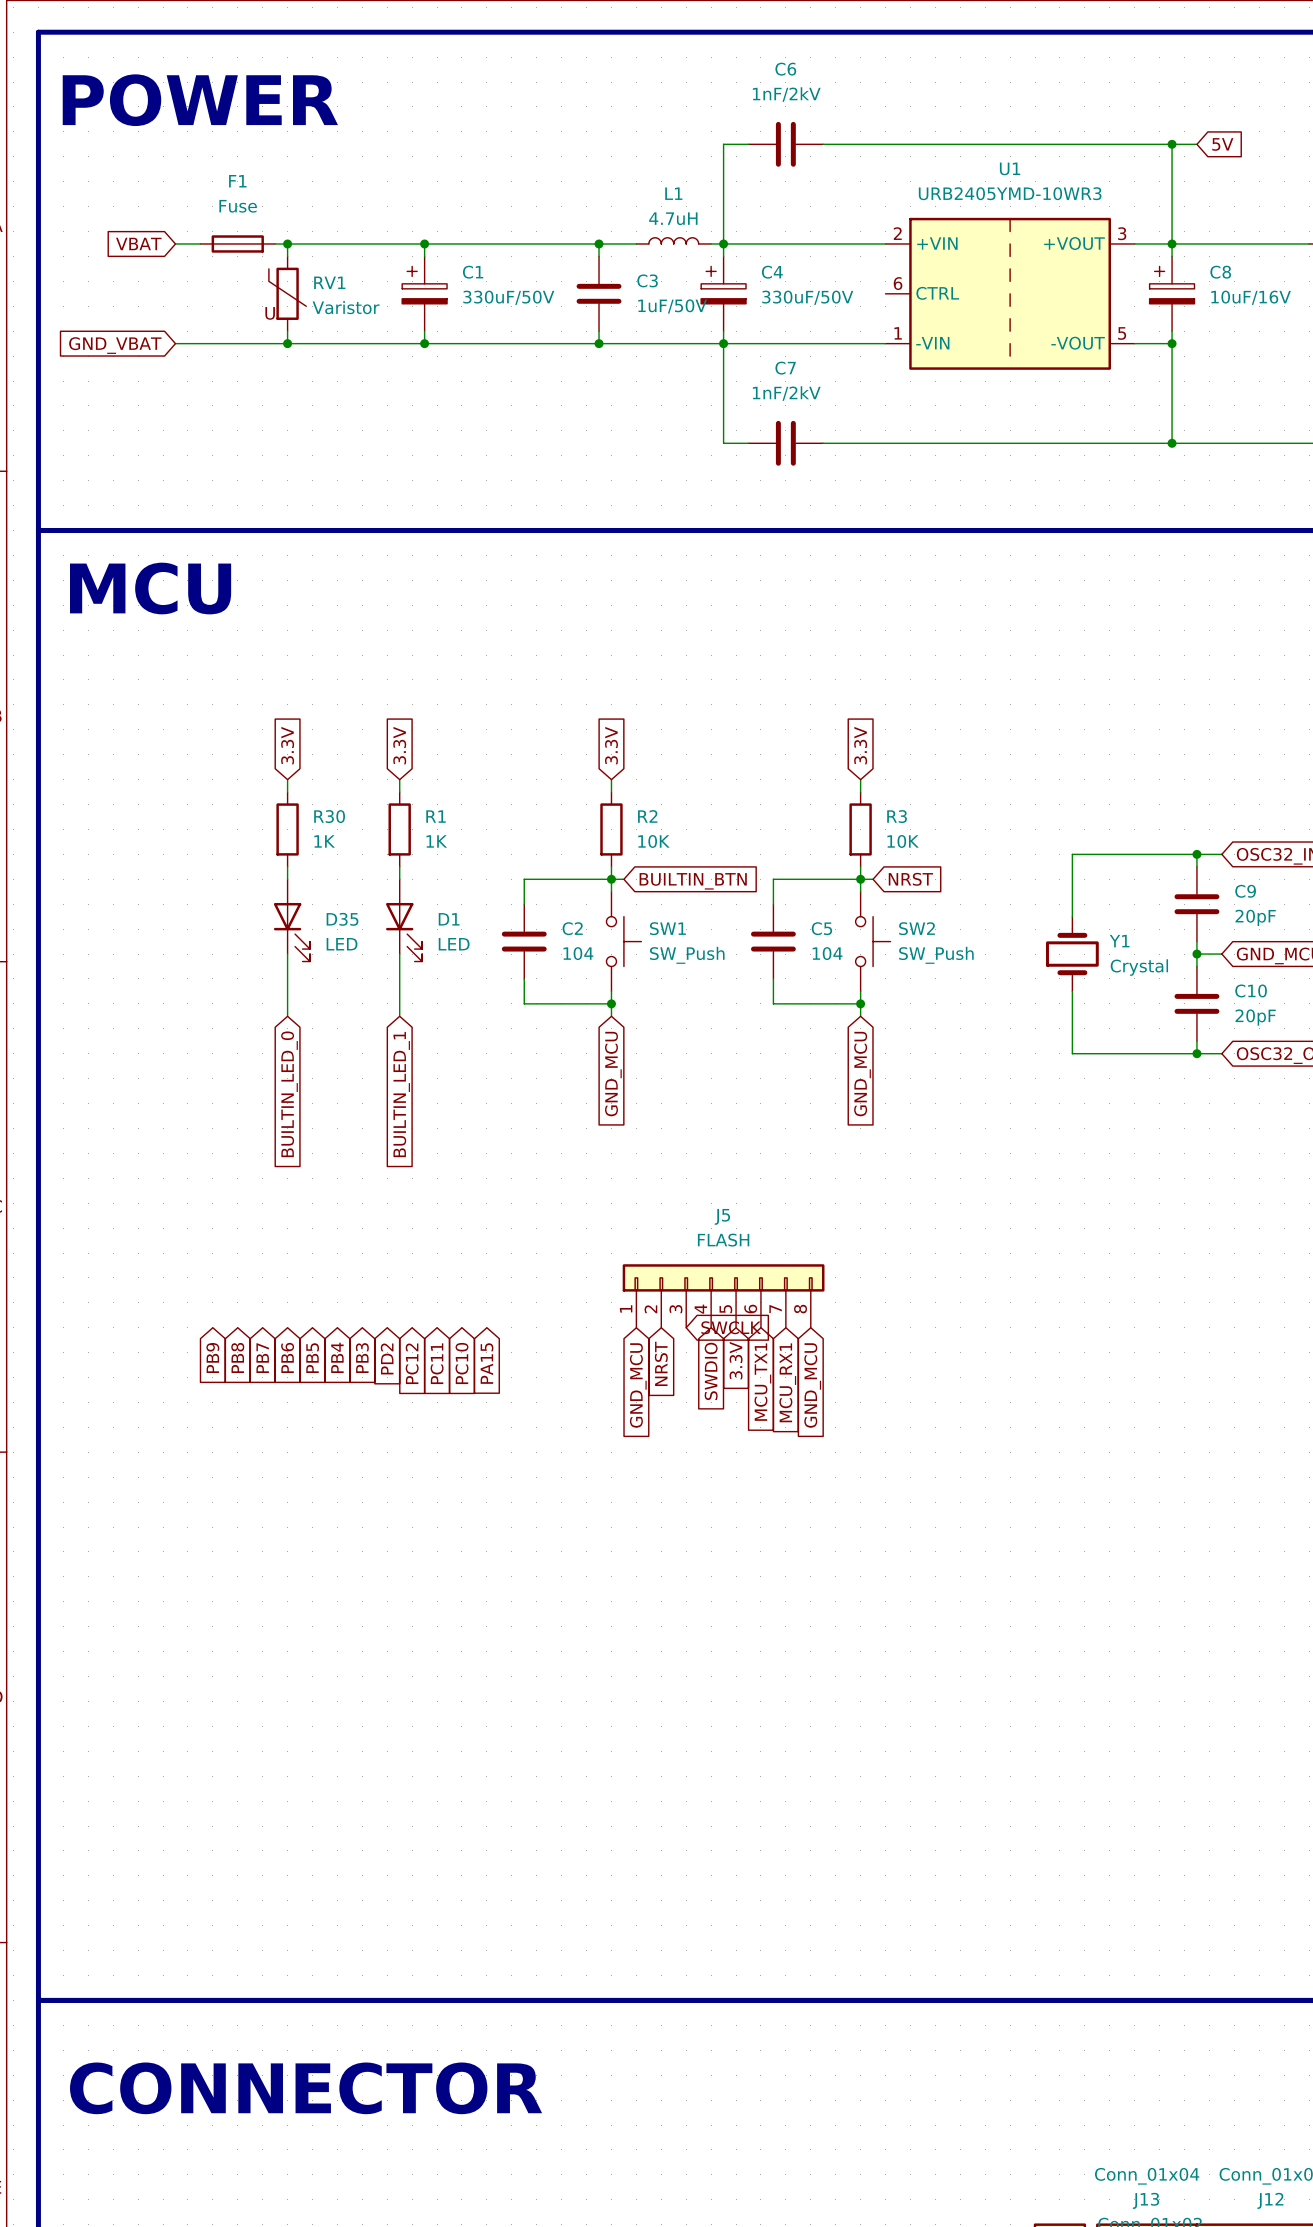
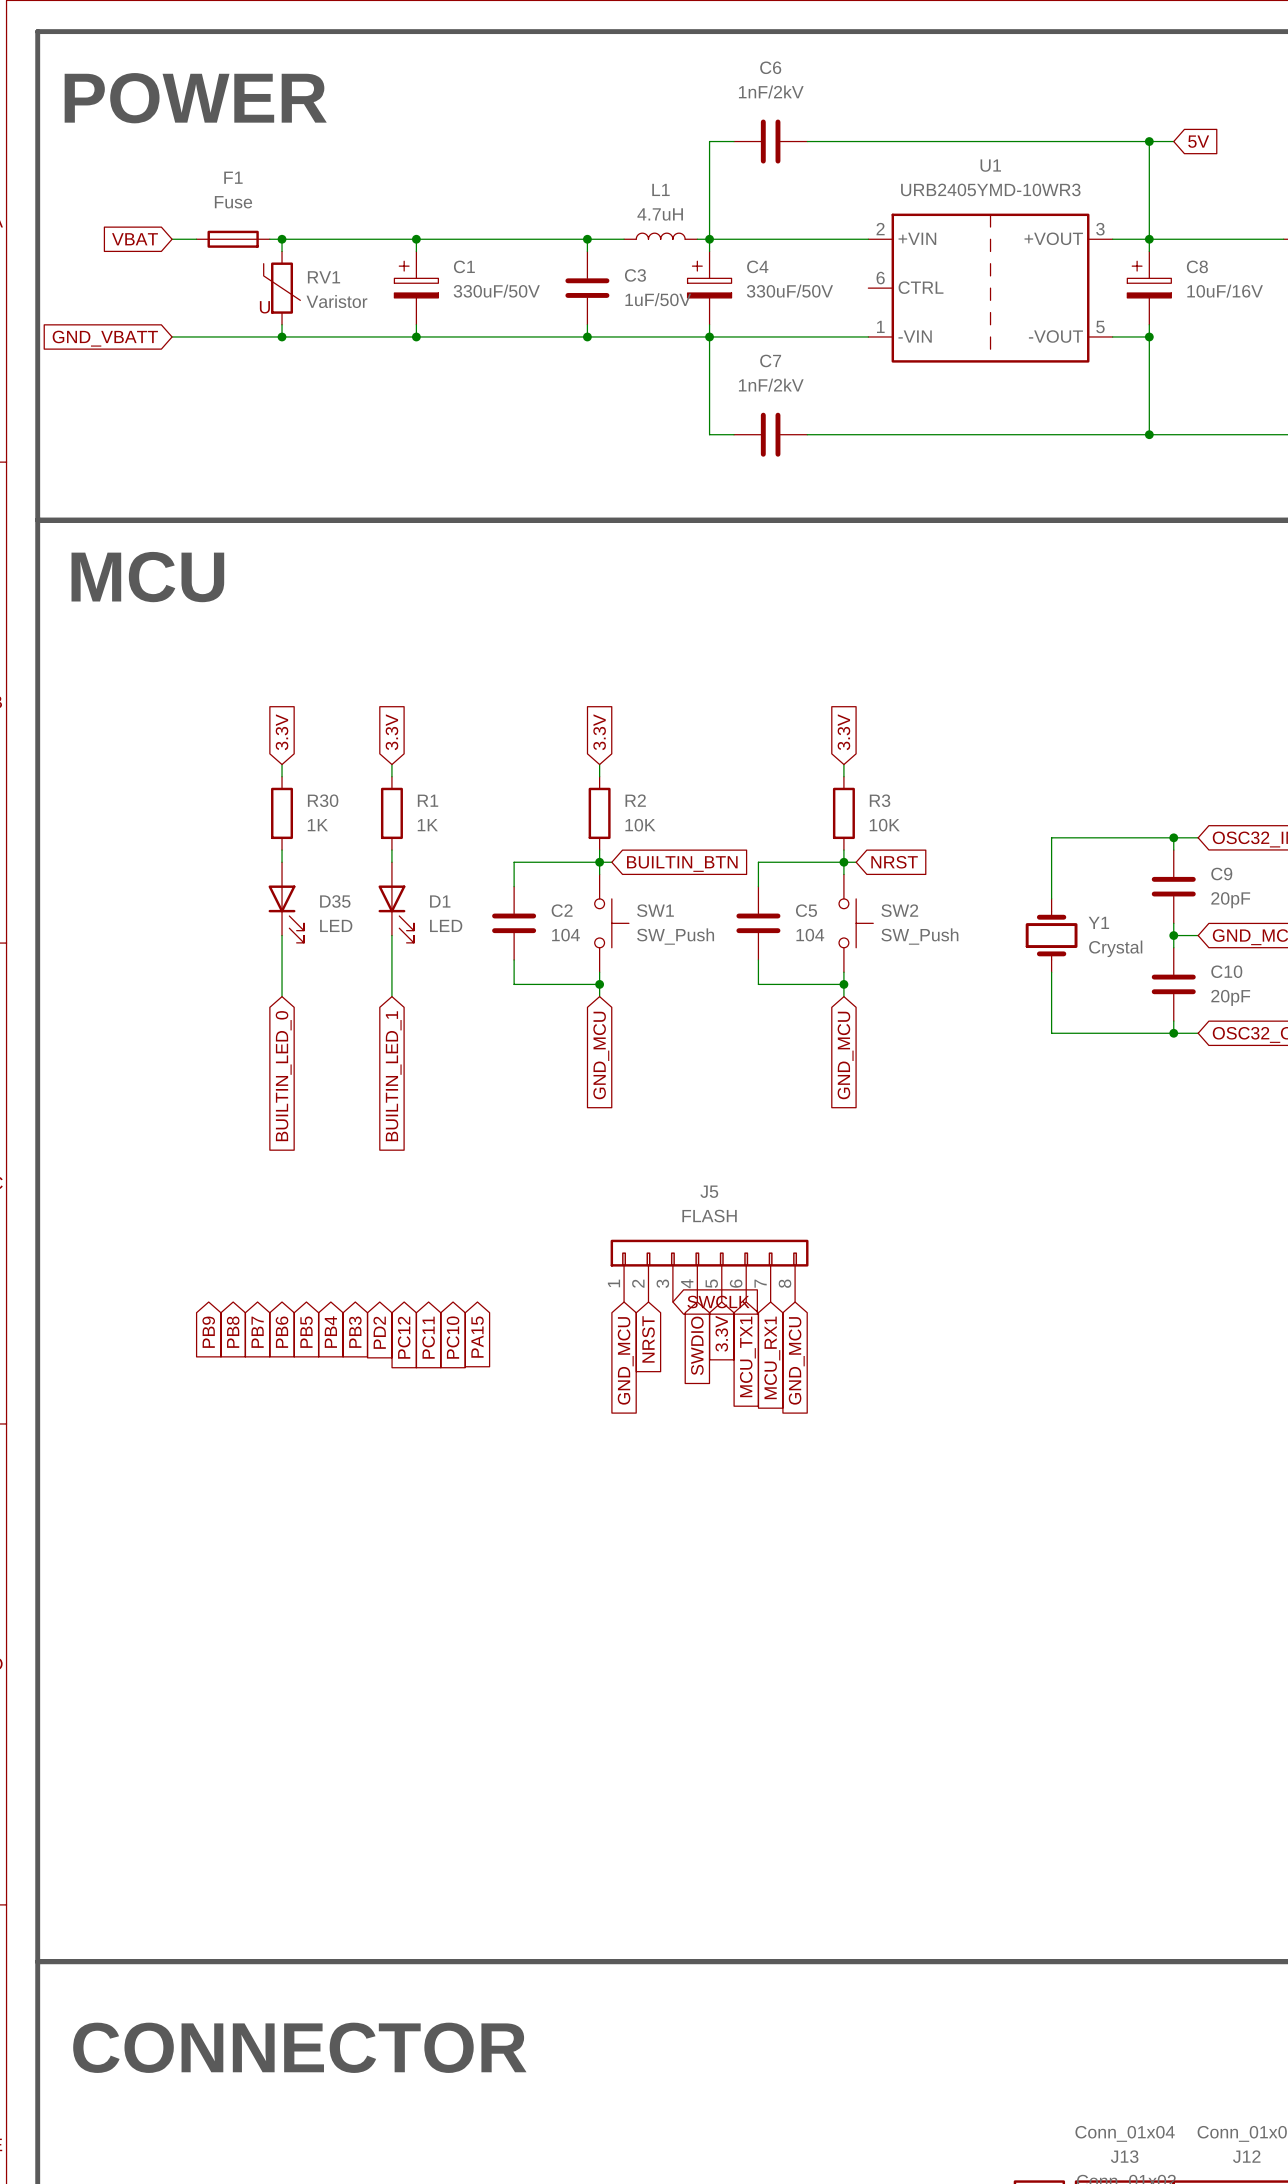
global label: GND_VBAT (115, 345) -> GND_VBATT (105, 338)

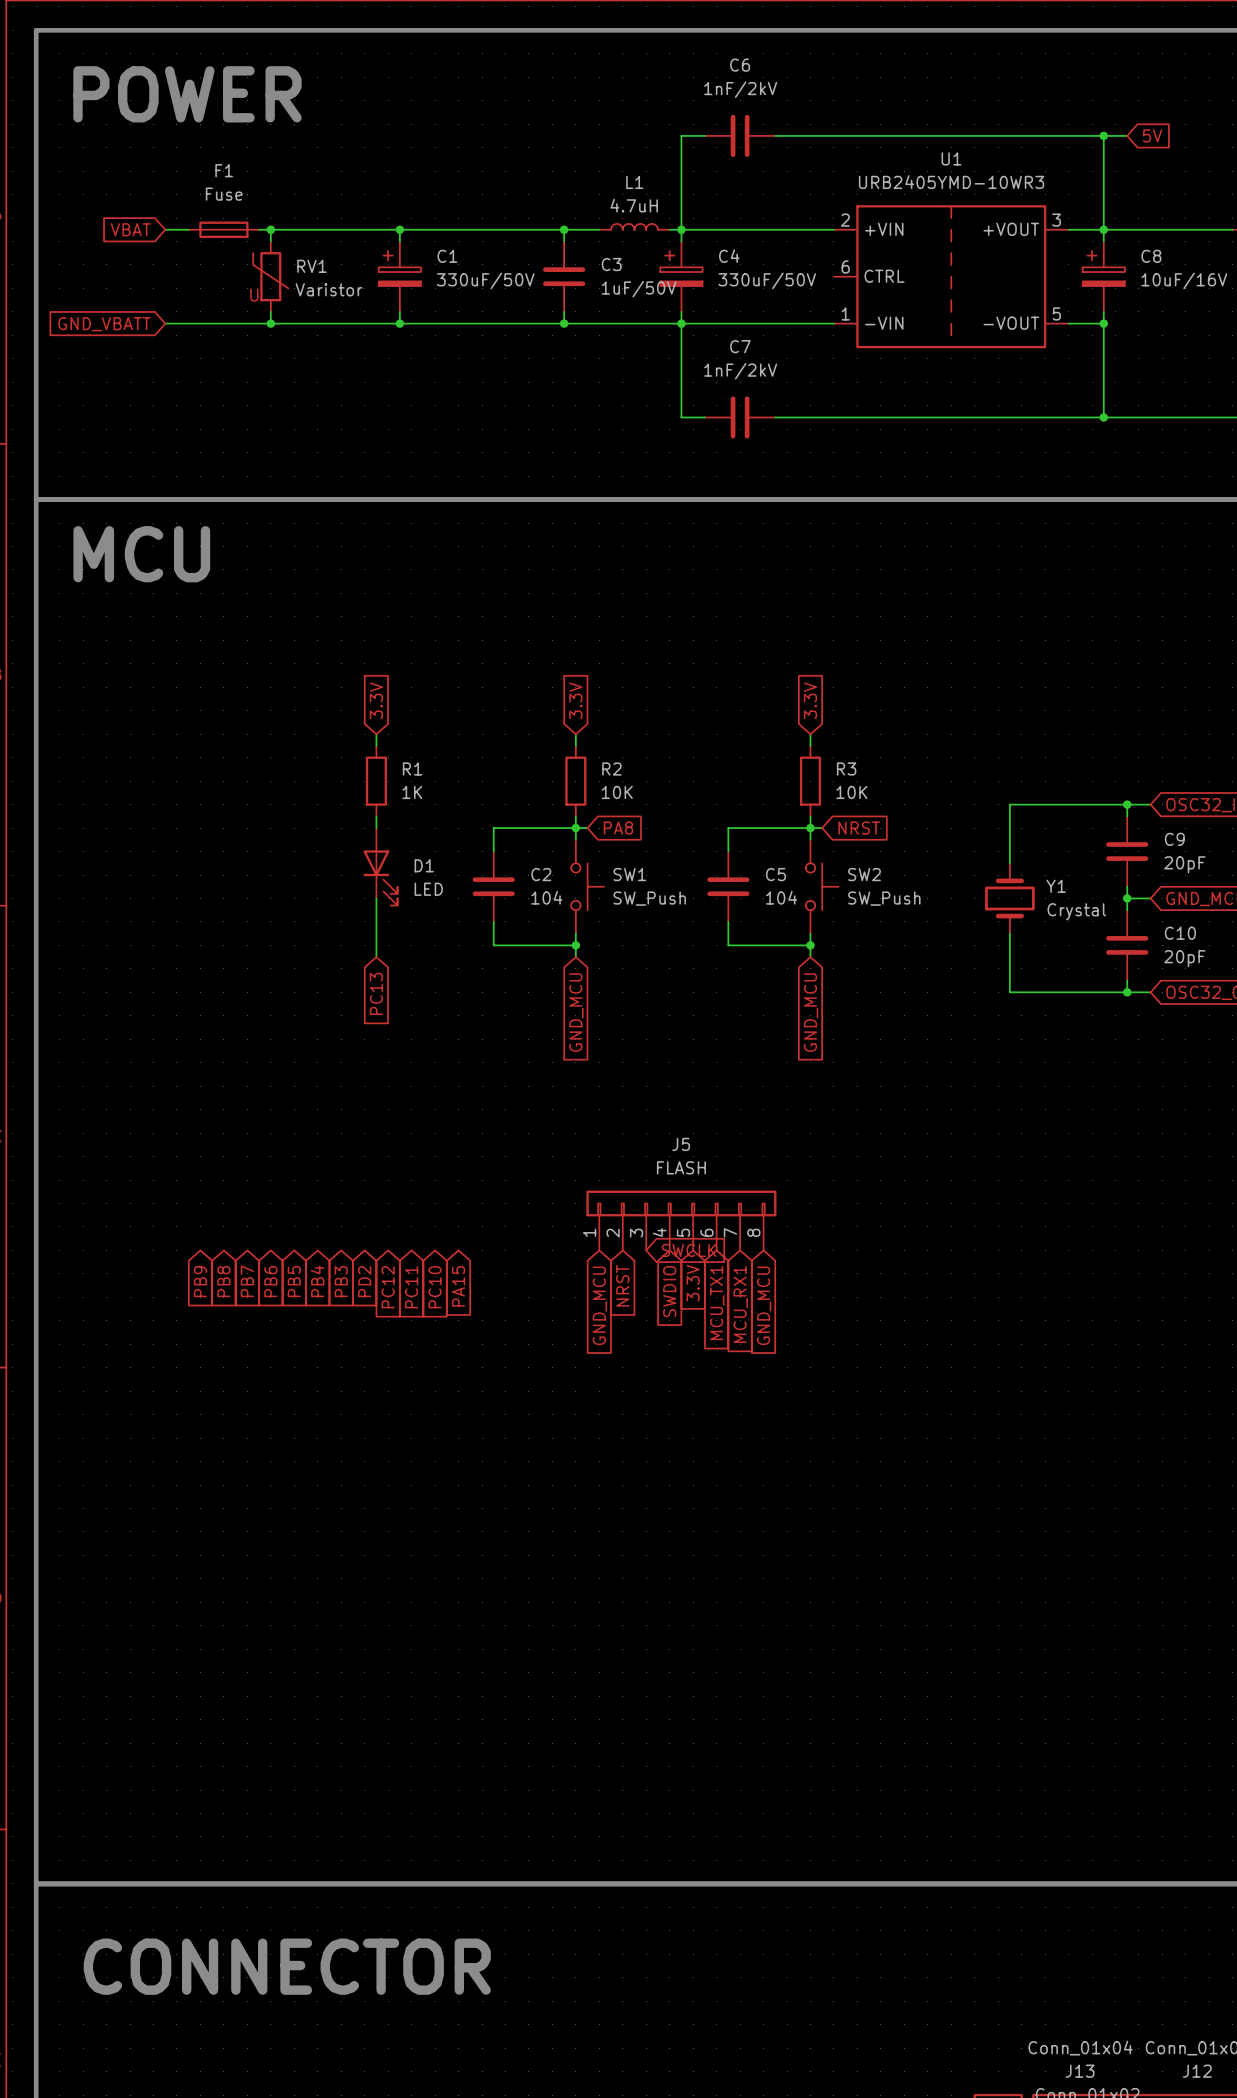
global label: 3.3V (282, 732) -> none
wire: (282, 764) (282, 776) -> none
R30: 1K (282, 813) -> none
wire: (282, 850) (282, 862) -> none
global label: BUILTIN_BTN (682, 864) -> PA8 (618, 828)
D35: LED (286, 902) -> none
wire: (282, 935) (282, 996) -> none
global label: BUILTIN_LED_0 (283, 1076) -> none
global label: BUILTIN_LED_1 (393, 1076) -> PC13 (376, 993)

